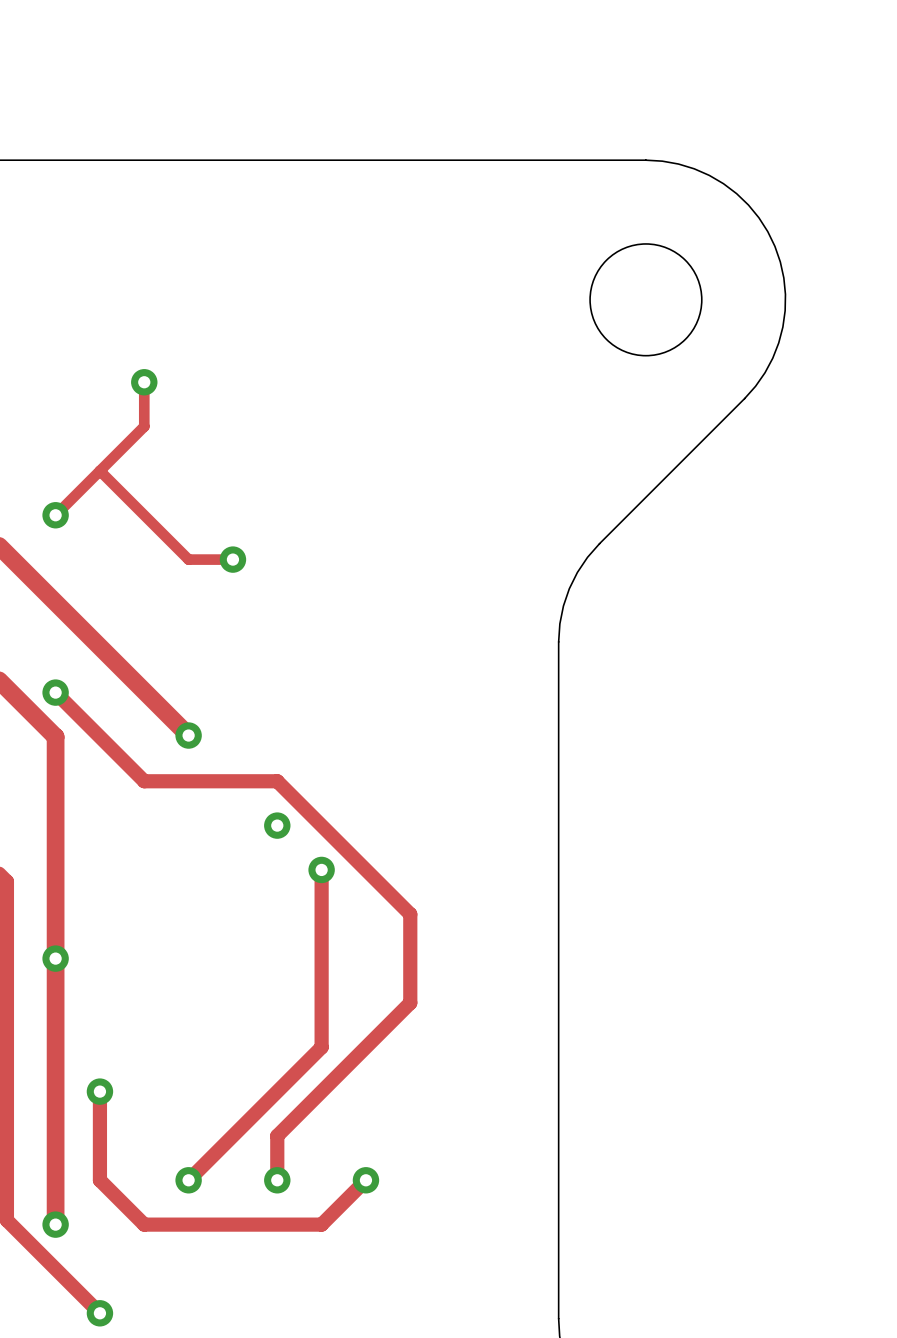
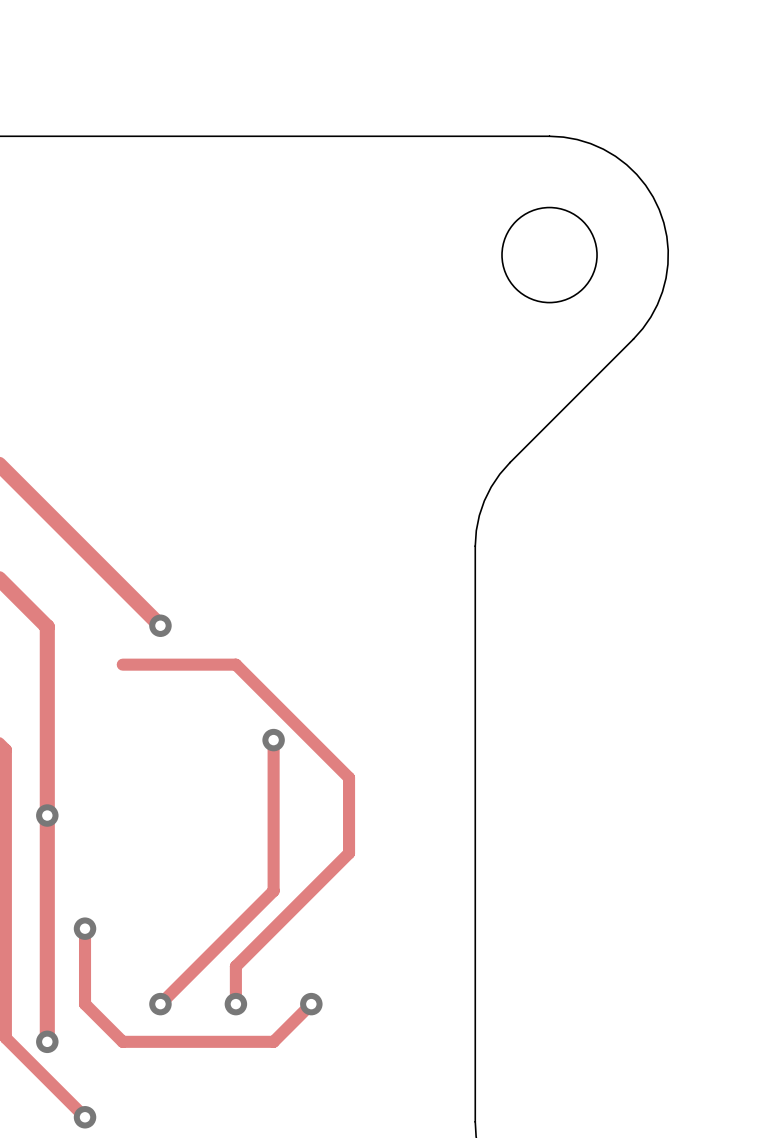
track: (144, 382) (144, 426) (55, 515) -> none
via: (144, 382) -> none
track: (99, 470) (188, 559) (232, 559) -> none
via: (55, 515) -> none
via: (232, 559) -> none
track: (55, 692) (144, 781) -> none
via: (55, 692) -> none
via: (277, 825) -> none

